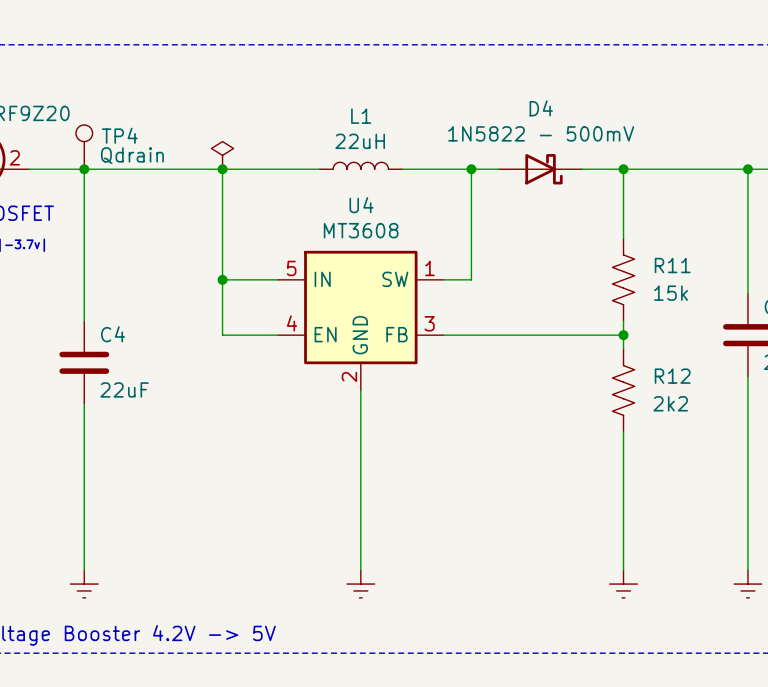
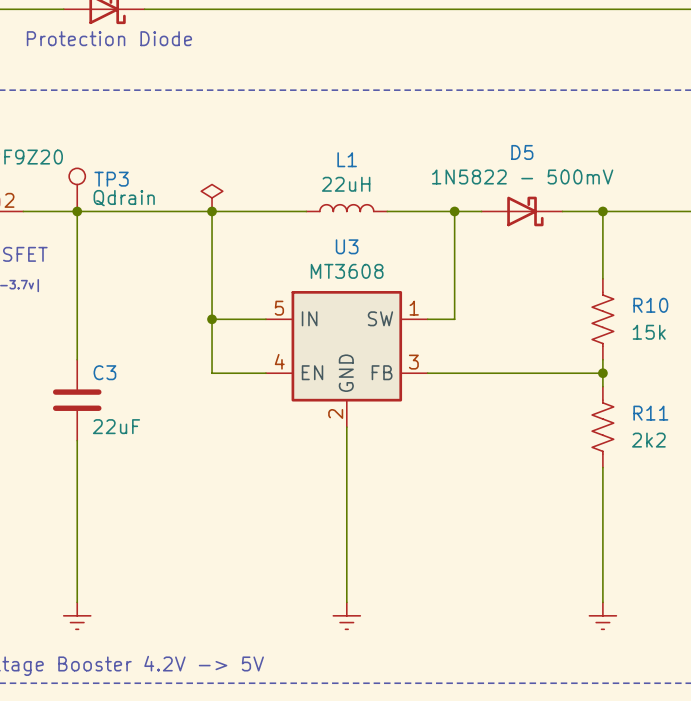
D4 name: D4 (541, 108) -> D5 (522, 152)
TP4 name: TP4 (119, 135) -> TP3 (111, 179)
U4 name: U4 (361, 205) -> U3 (347, 246)
R11 name: R11 (672, 265) -> R10 (650, 305)
C4 name: C4 (113, 334) -> C3 (104, 372)
R12 name: R12 (672, 376) -> R11 (650, 413)

